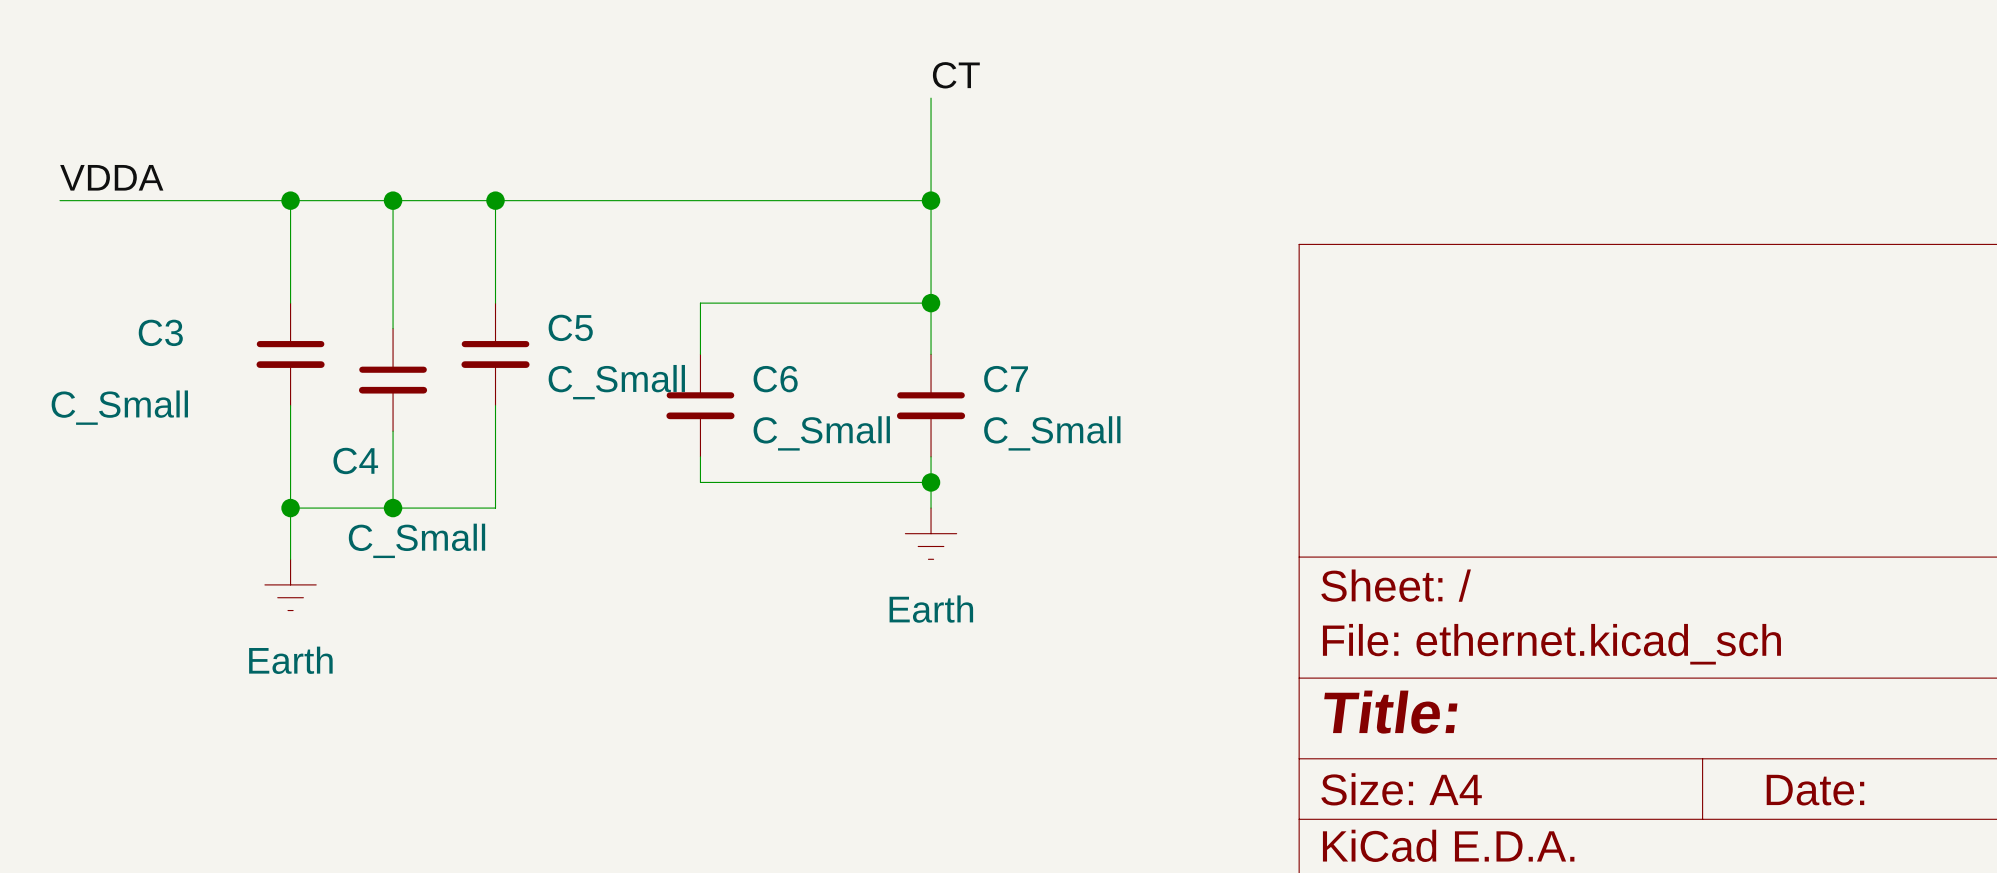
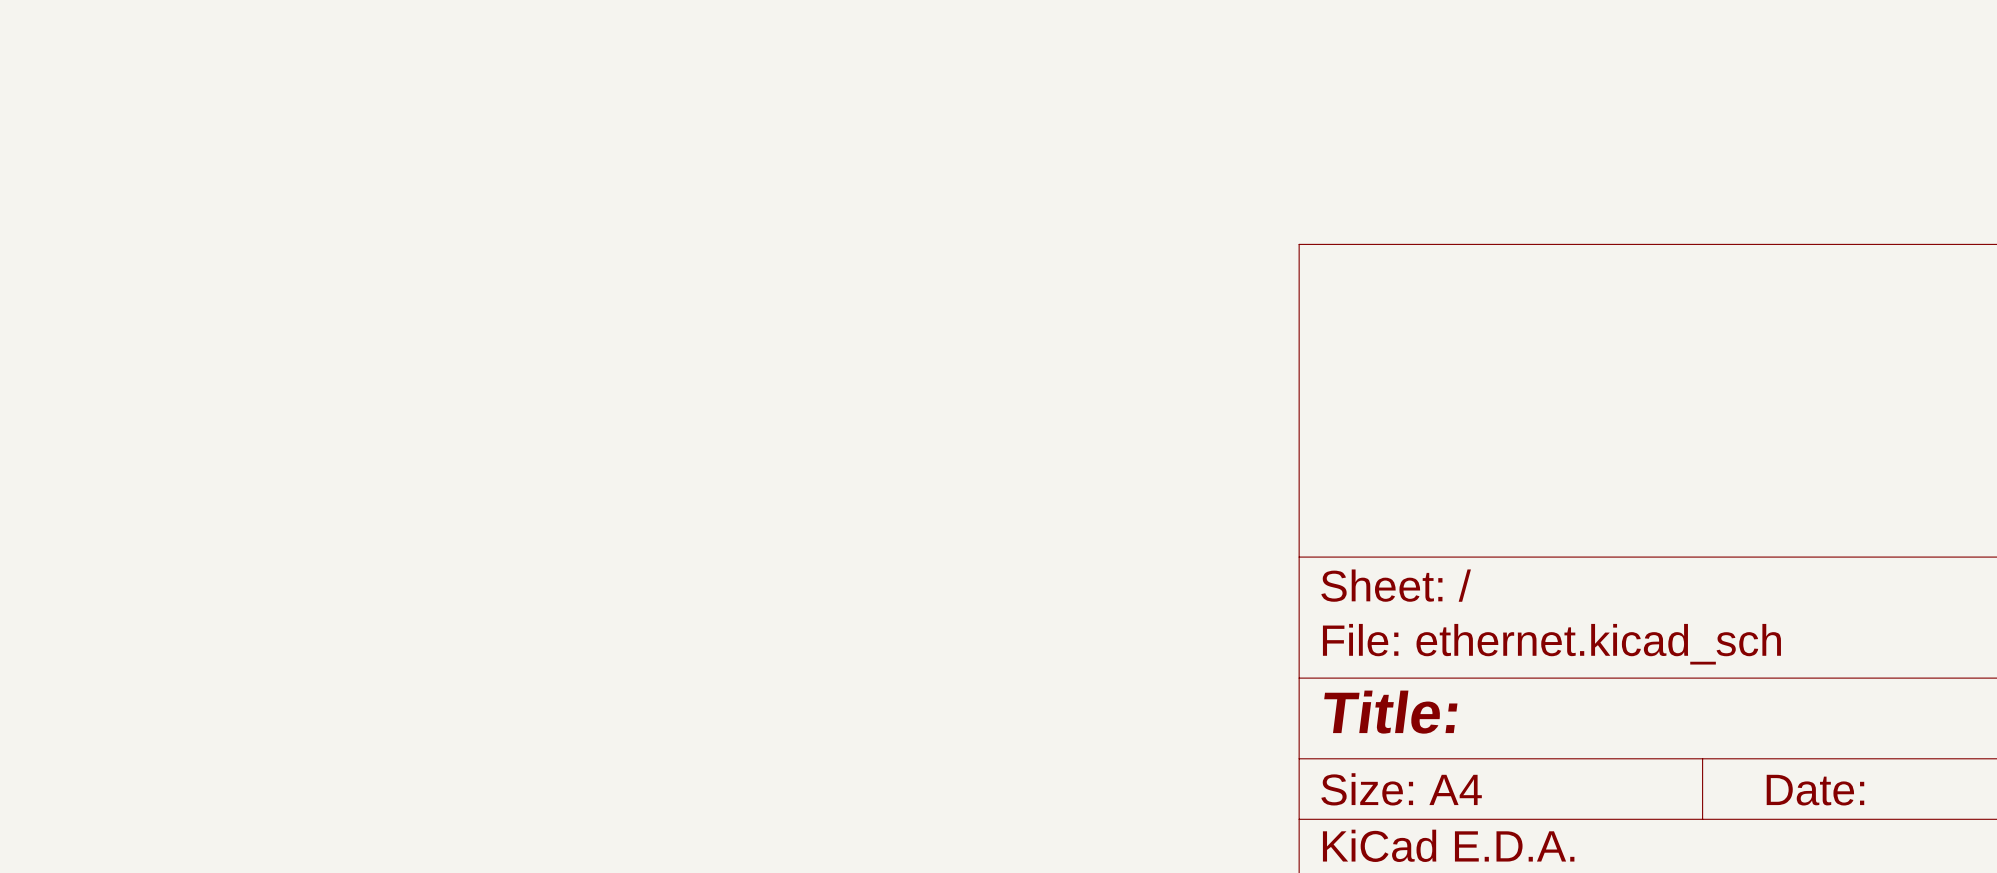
label: CT (956, 75) -> none
wire: (931, 98) (931, 354) -> none
label: VDDA (111, 177) -> none
wire: (60, 200) (931, 200) -> none
wire: (290, 200) (290, 303) -> none
junction: (290, 200) -> none
wire: (393, 200) (393, 328) -> none
junction: (393, 200) -> none
wire: (495, 200) (495, 303) -> none
junction: (495, 200) -> none
junction: (931, 200) -> none
wire: (931, 303) (700, 303) (700, 354) -> none
junction: (931, 303) -> none
C3: C_Small (290, 354) -> none
C5: C_Small (495, 354) -> none
C4: C_Small (393, 379) -> none
wire: (290, 405) (290, 559) -> none
wire: (495, 405) (495, 508) (290, 508) -> none
C6: C_Small (700, 405) -> none
C7: C_Small (931, 405) -> none
wire: (393, 431) (393, 508) -> none
wire: (700, 456) (700, 482) (931, 482) -> none
wire: (931, 456) (931, 508) -> none
junction: (931, 482) -> none
junction: (290, 508) -> none
junction: (393, 508) -> none
power symbol: Earth (931, 533) -> none
power symbol: Earth (290, 584) -> none

